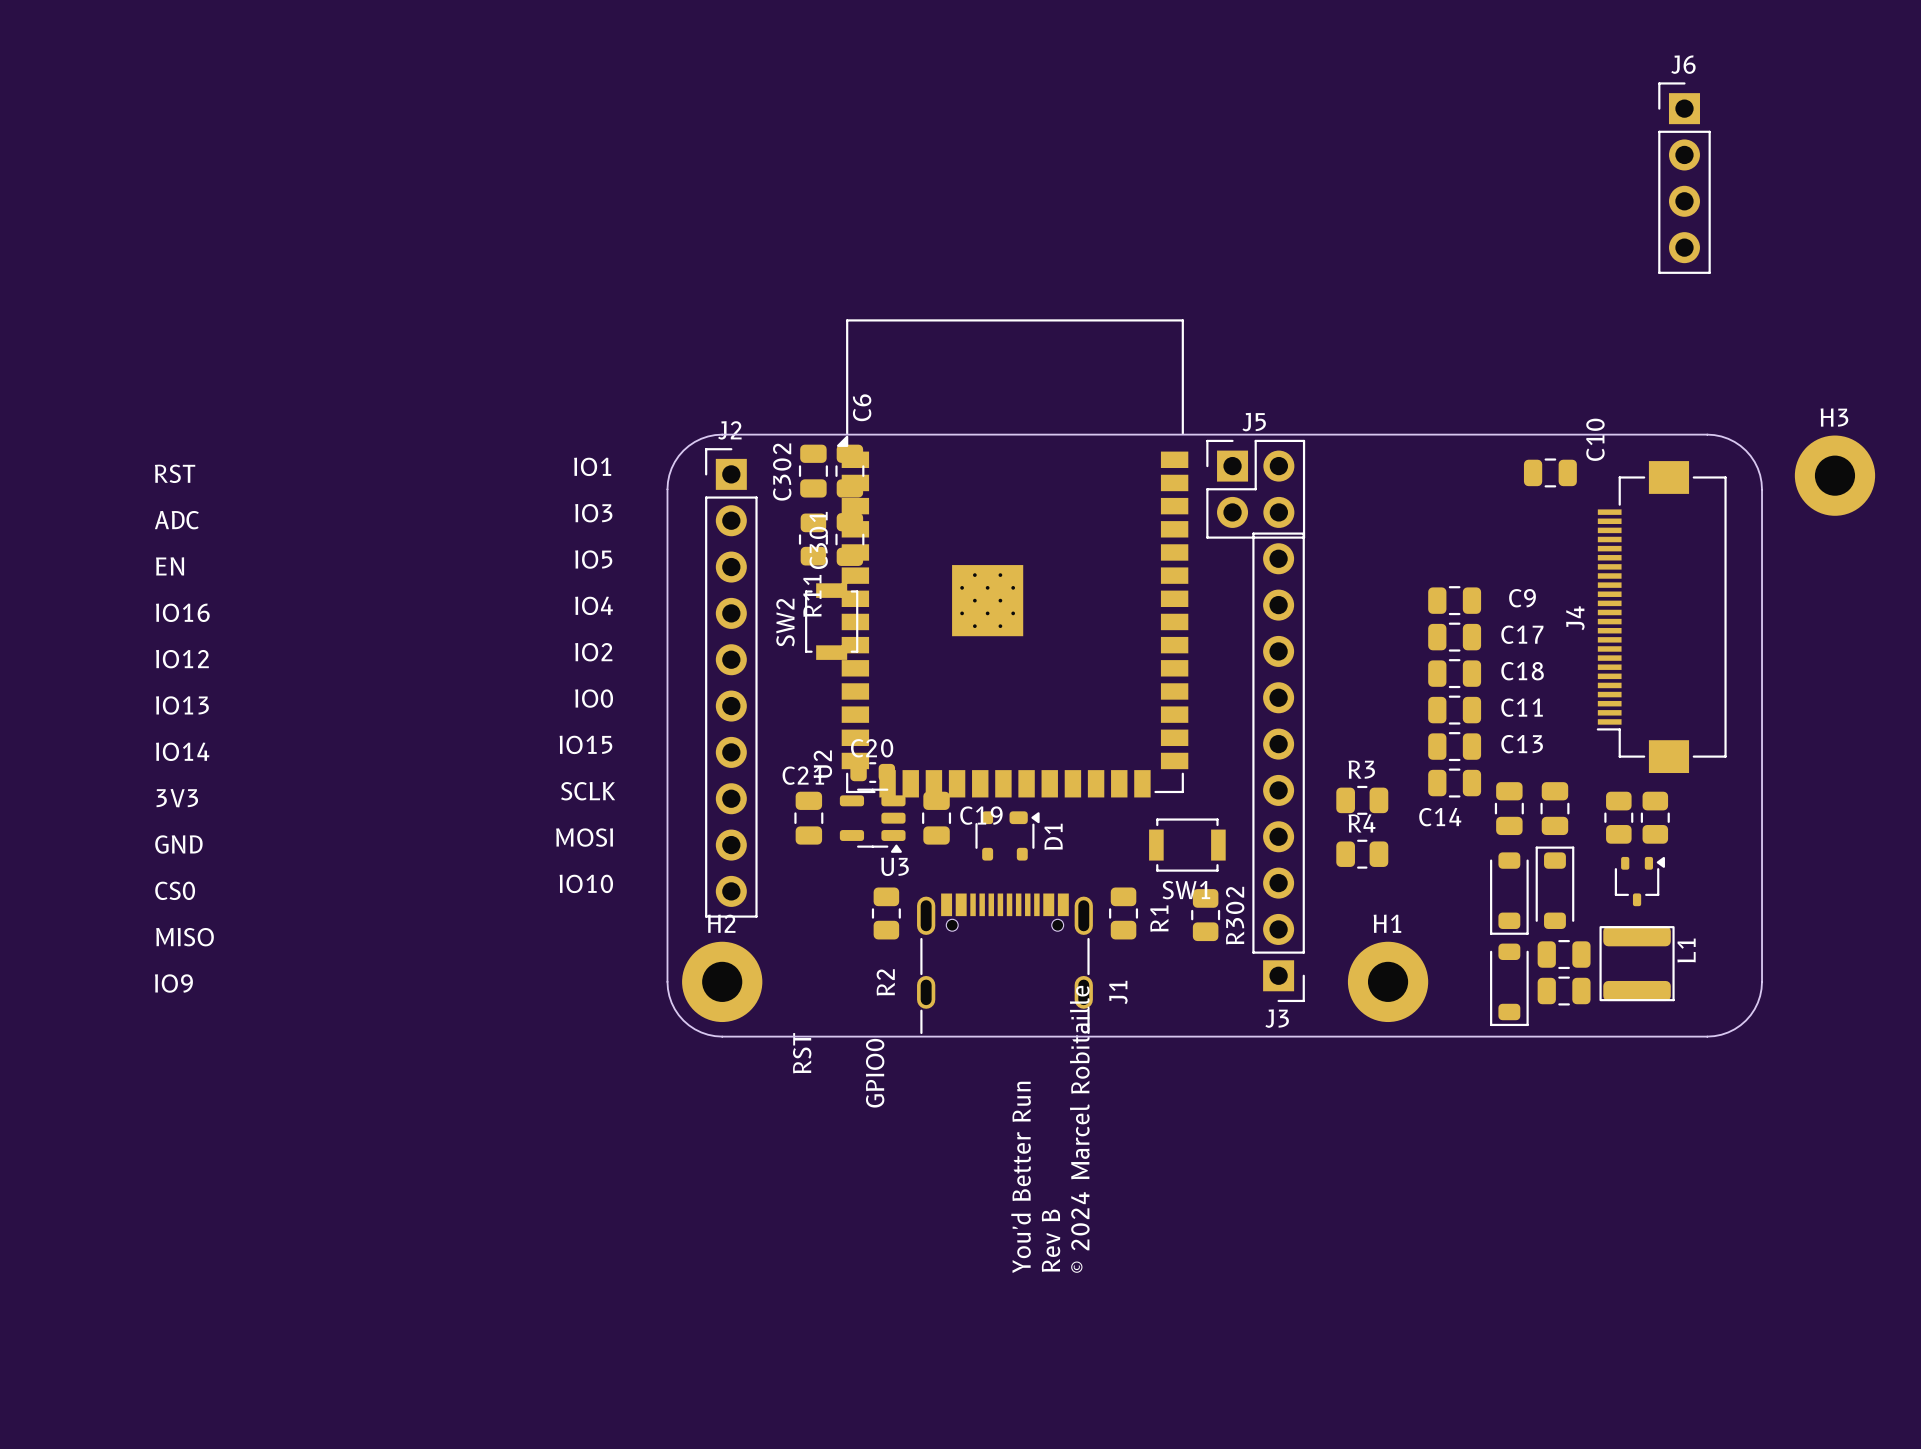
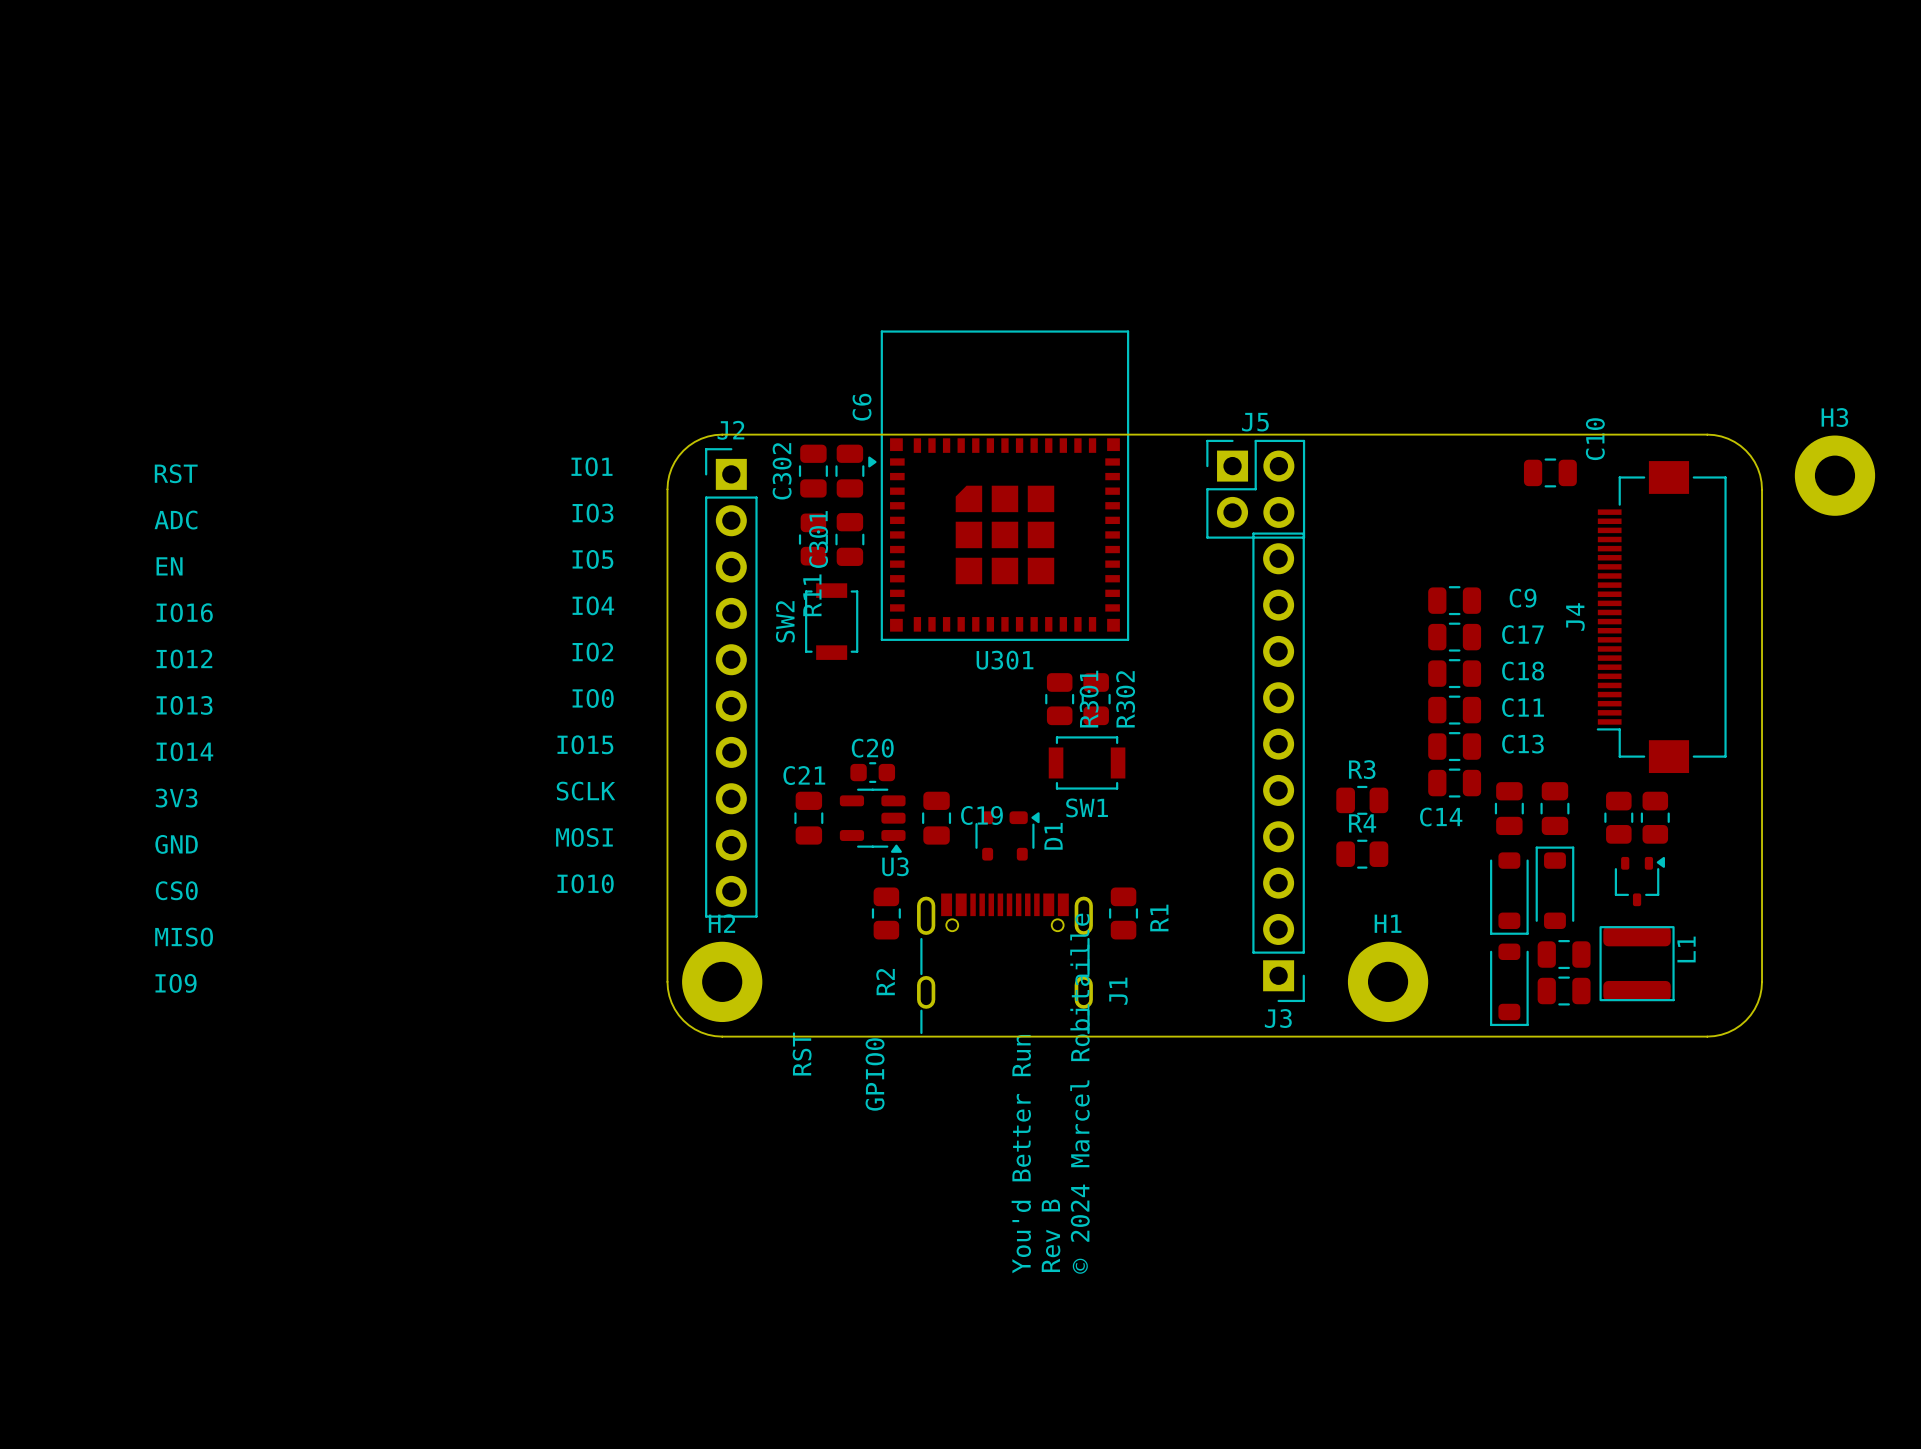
J6: (1684, 178) -> none
U301: none -> (998, 485)
U2: (1012, 558) -> none
R301: none -> (1059, 699)
SW1 position: (1187, 845) -> (1087, 762)
R302 position: (1205, 915) -> (1096, 699)

